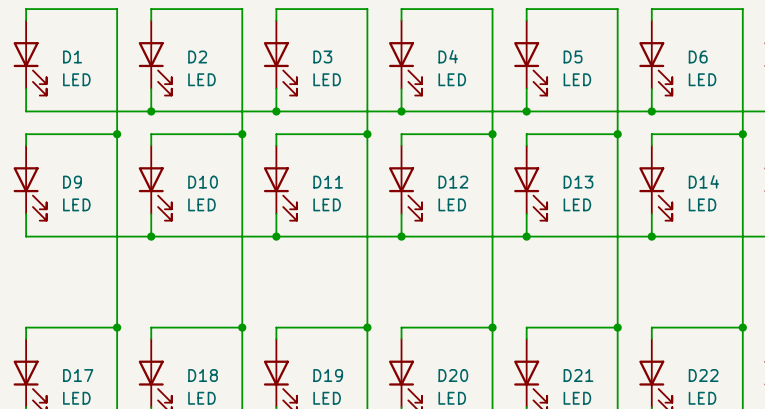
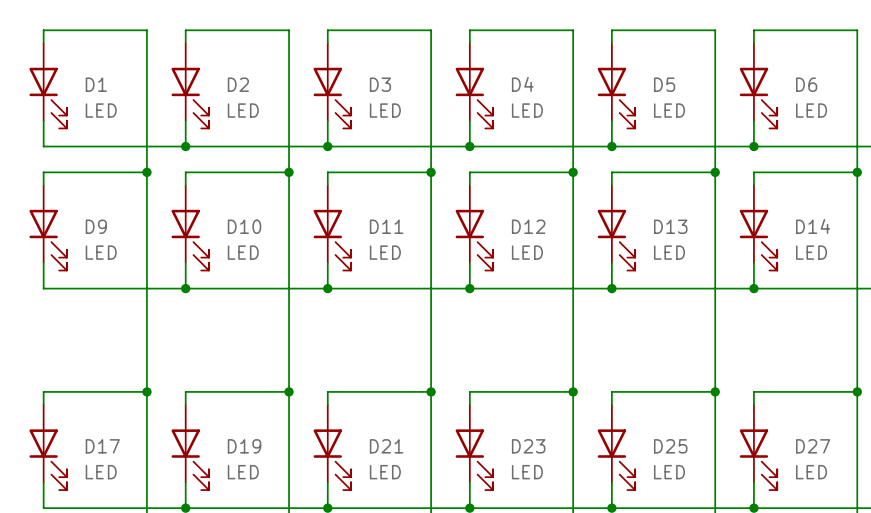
D18 name: D18 (203, 375) -> D19 (244, 446)
D19 name: D19 (328, 375) -> D21 (386, 446)
D20 name: D20 (453, 375) -> D23 (528, 446)
D21 name: D21 (578, 375) -> D25 (670, 446)
D22 name: D22 (703, 375) -> D27 (813, 446)

